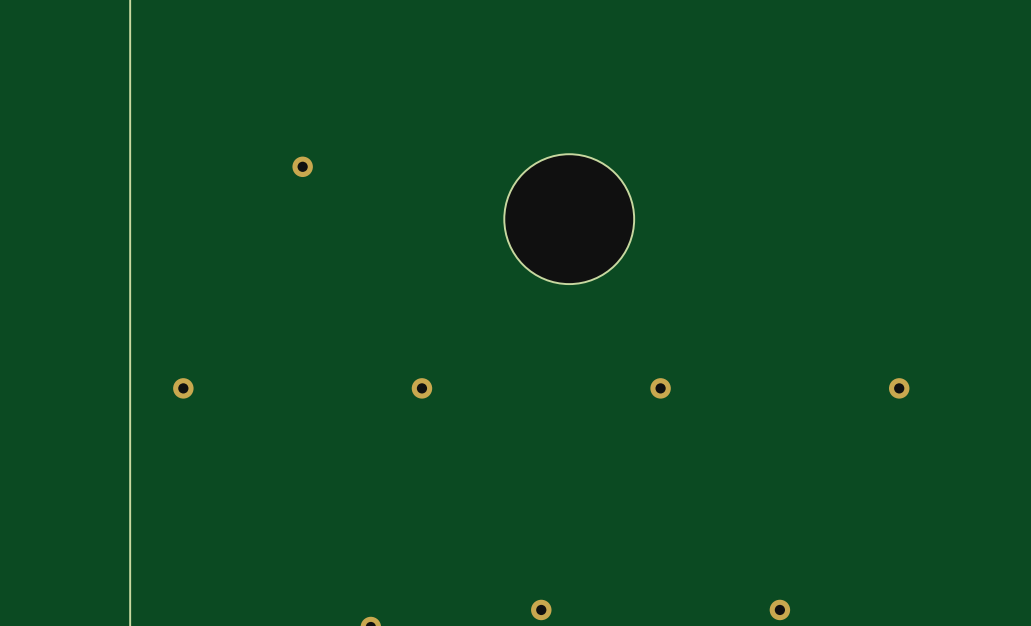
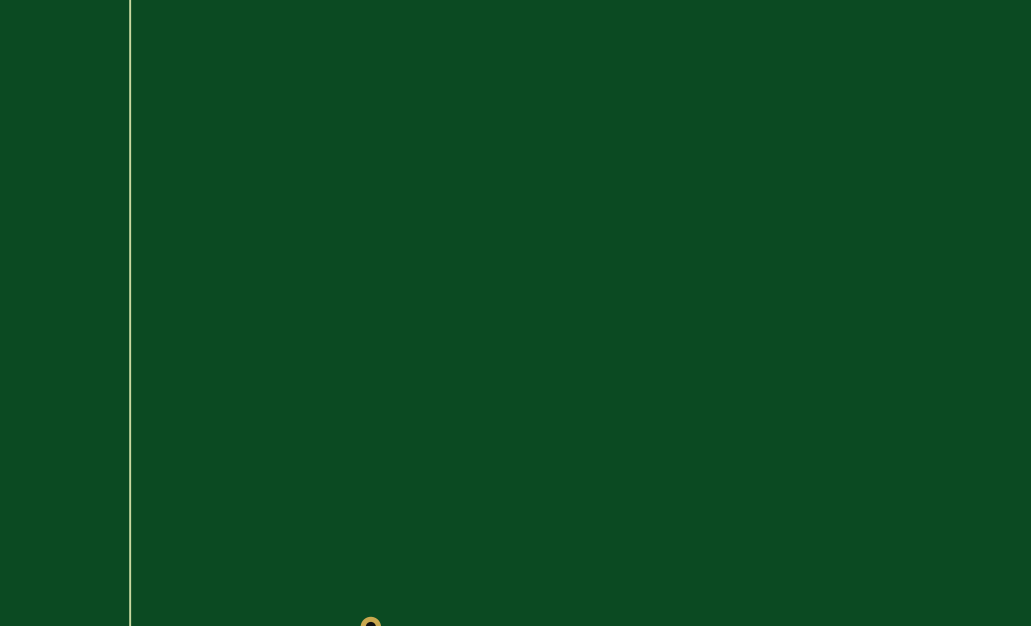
via: (302, 166) -> none
part: (569, 219) -> none
via: (183, 388) -> none
via: (421, 388) -> none
via: (660, 388) -> none
via: (899, 388) -> none
via: (541, 609) -> none
via: (779, 609) -> none

